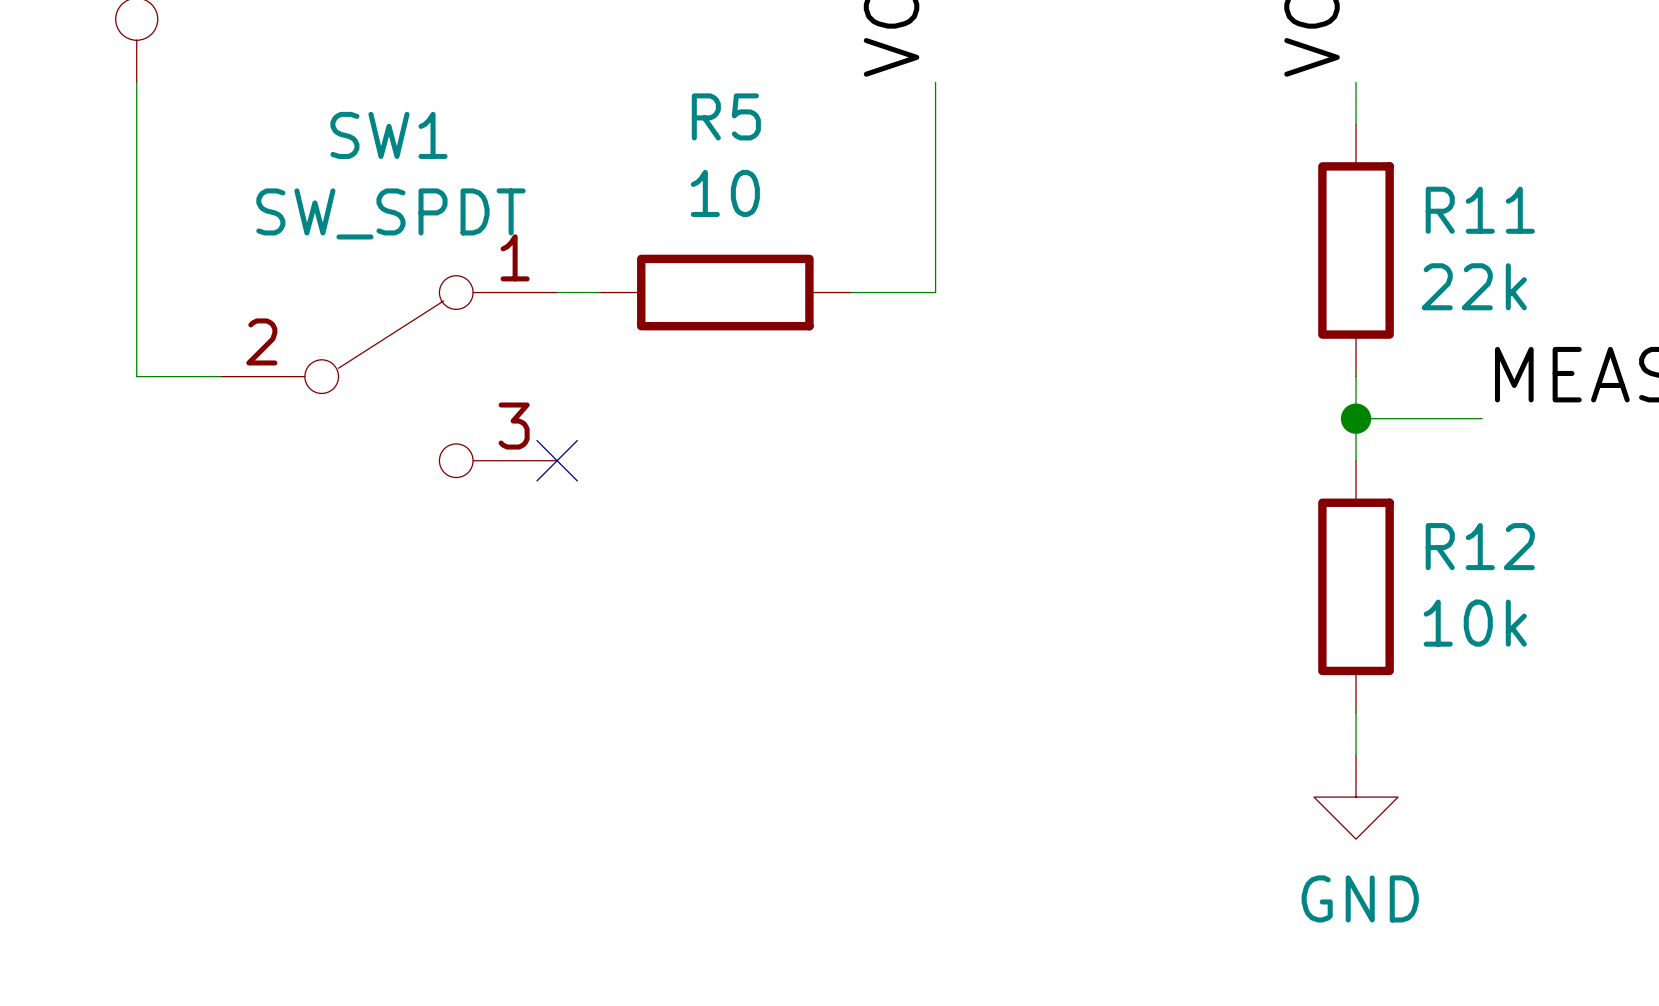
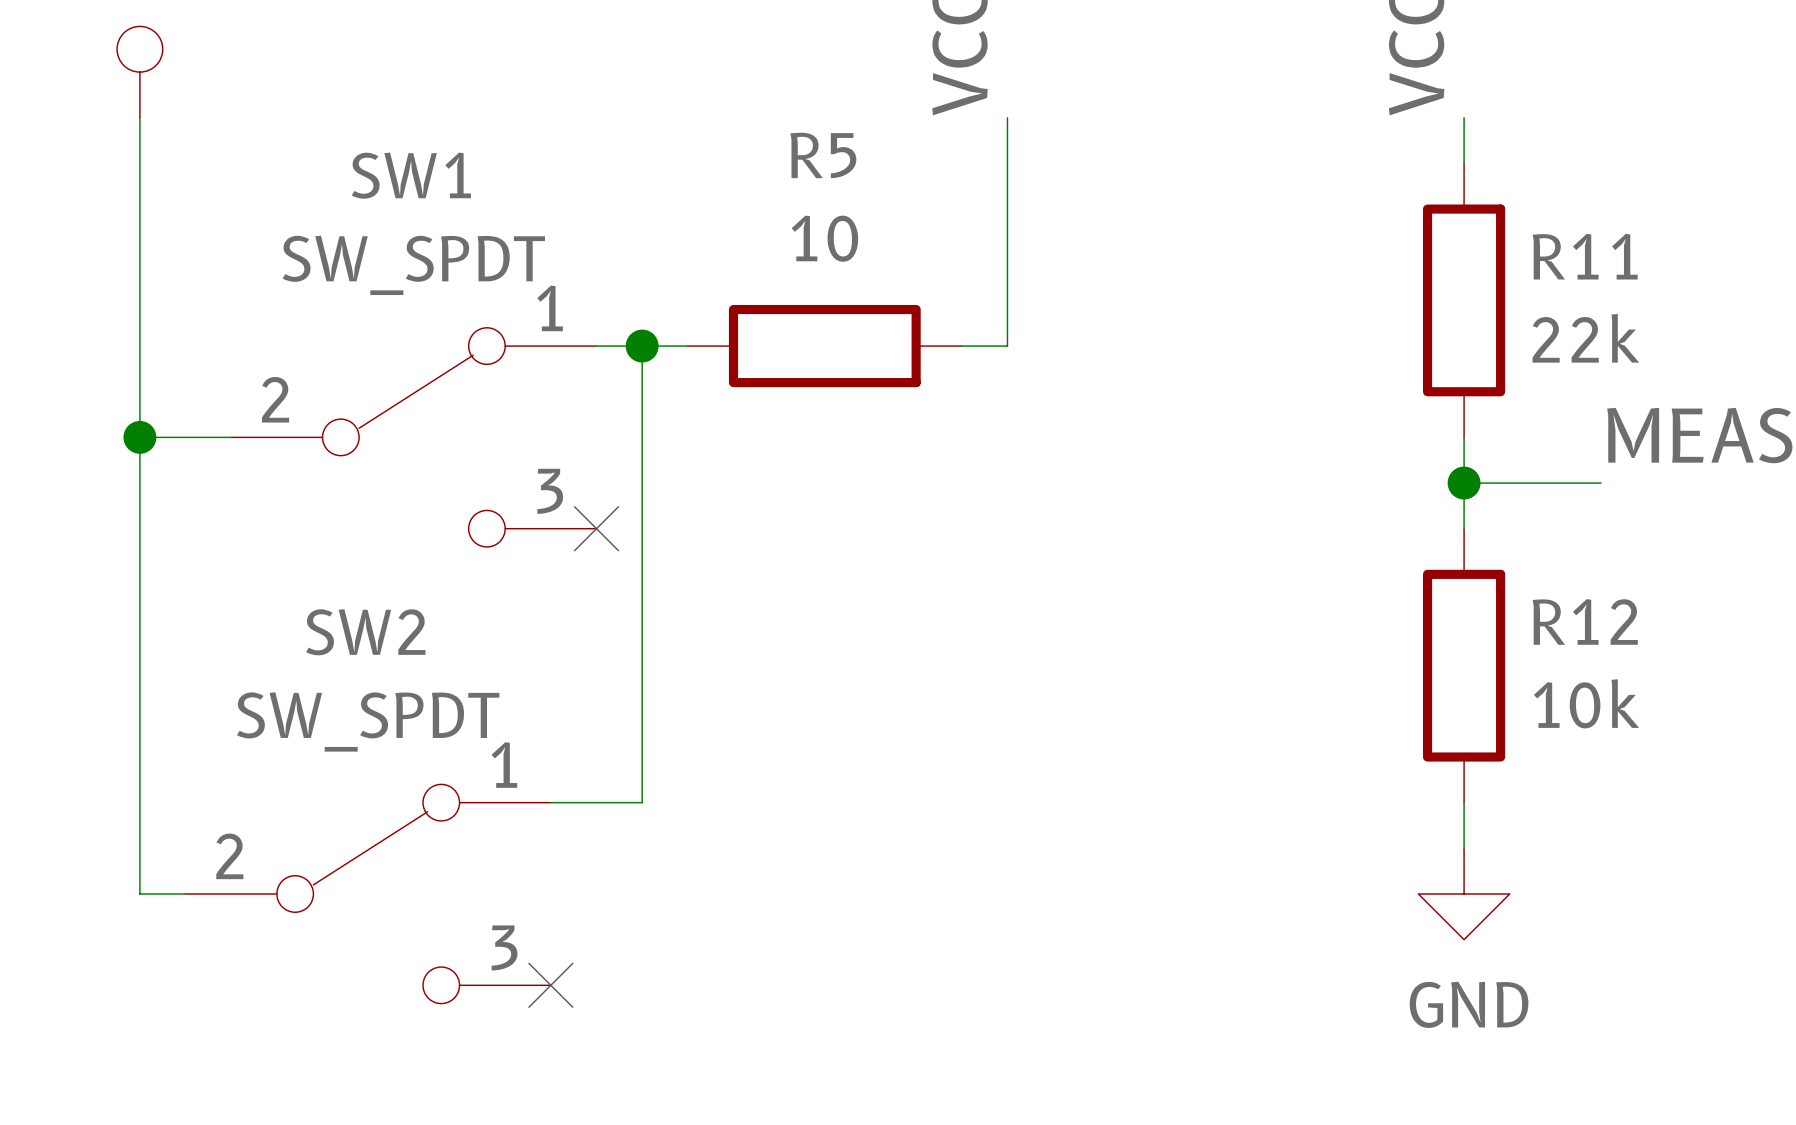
junction: none -> (642, 346)
wire: none -> (687, 346) (642, 346) (642, 802) (550, 802)
R5 position: (725, 292) -> (824, 346)
wire: none -> (139, 437) (139, 893) (185, 893)
junction: none -> (139, 437)
SW2: none -> SW_SPDT (368, 893)
no-connect mark: none -> (550, 985)

